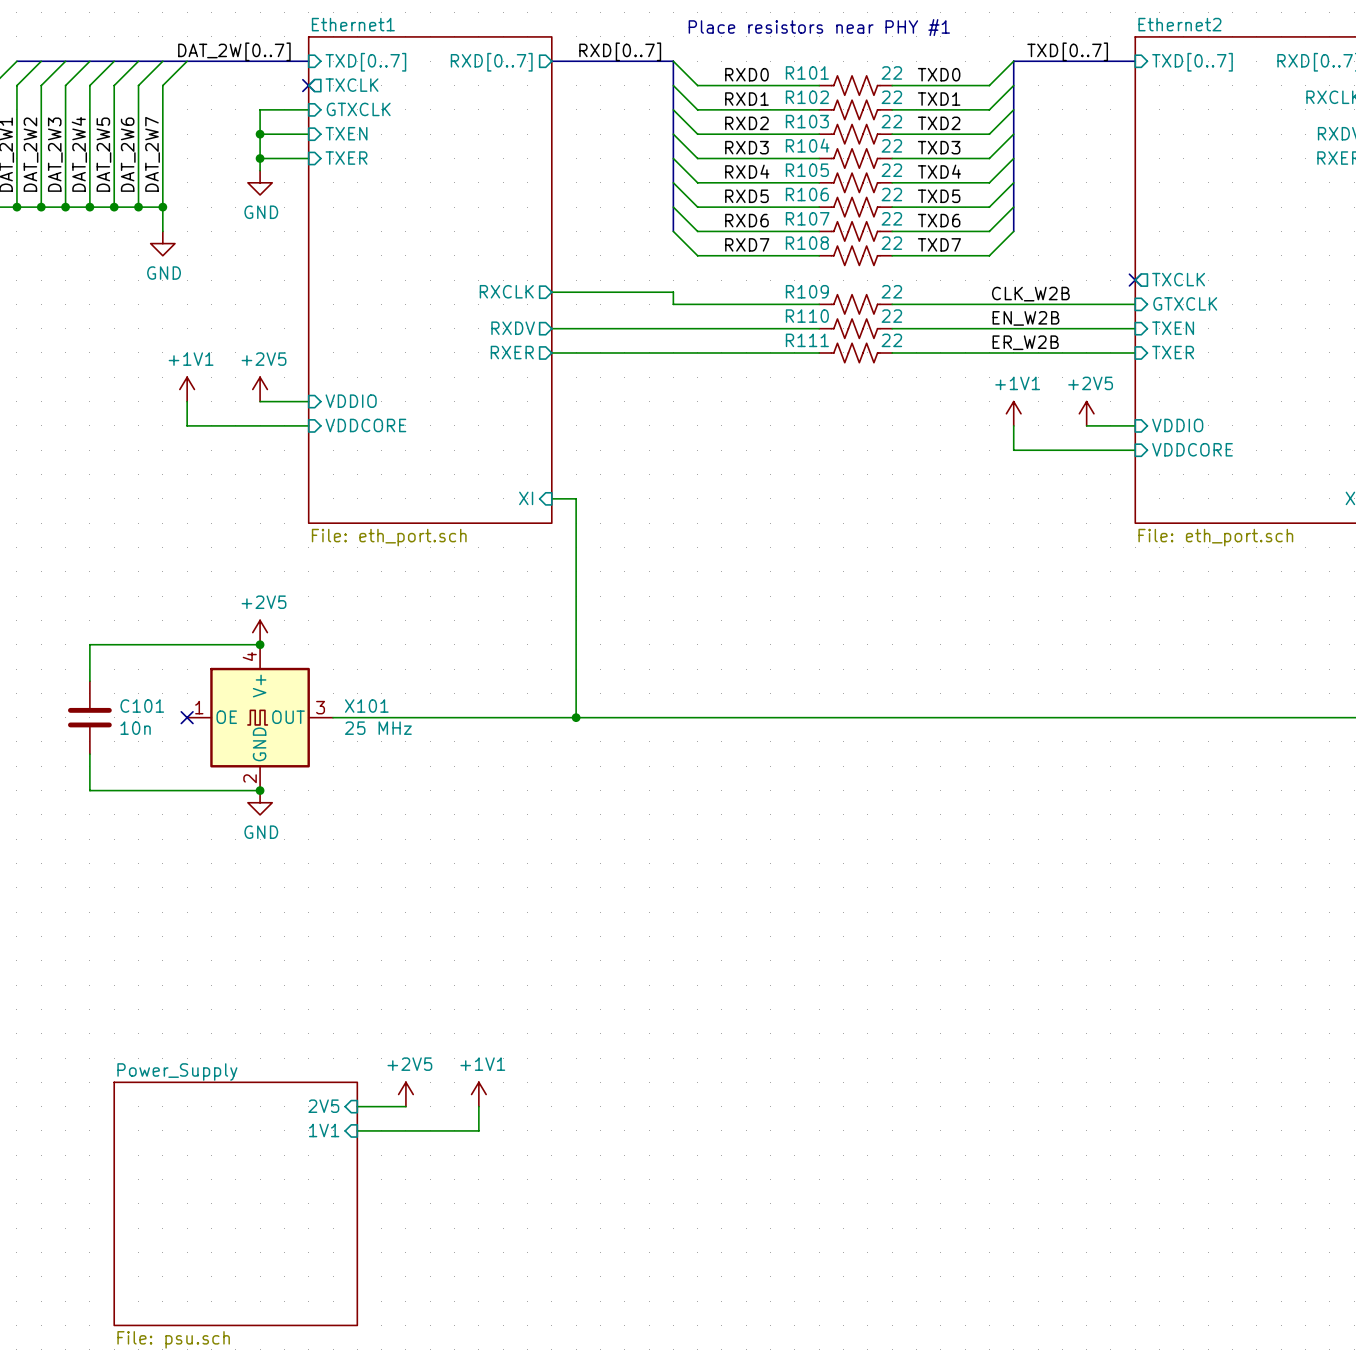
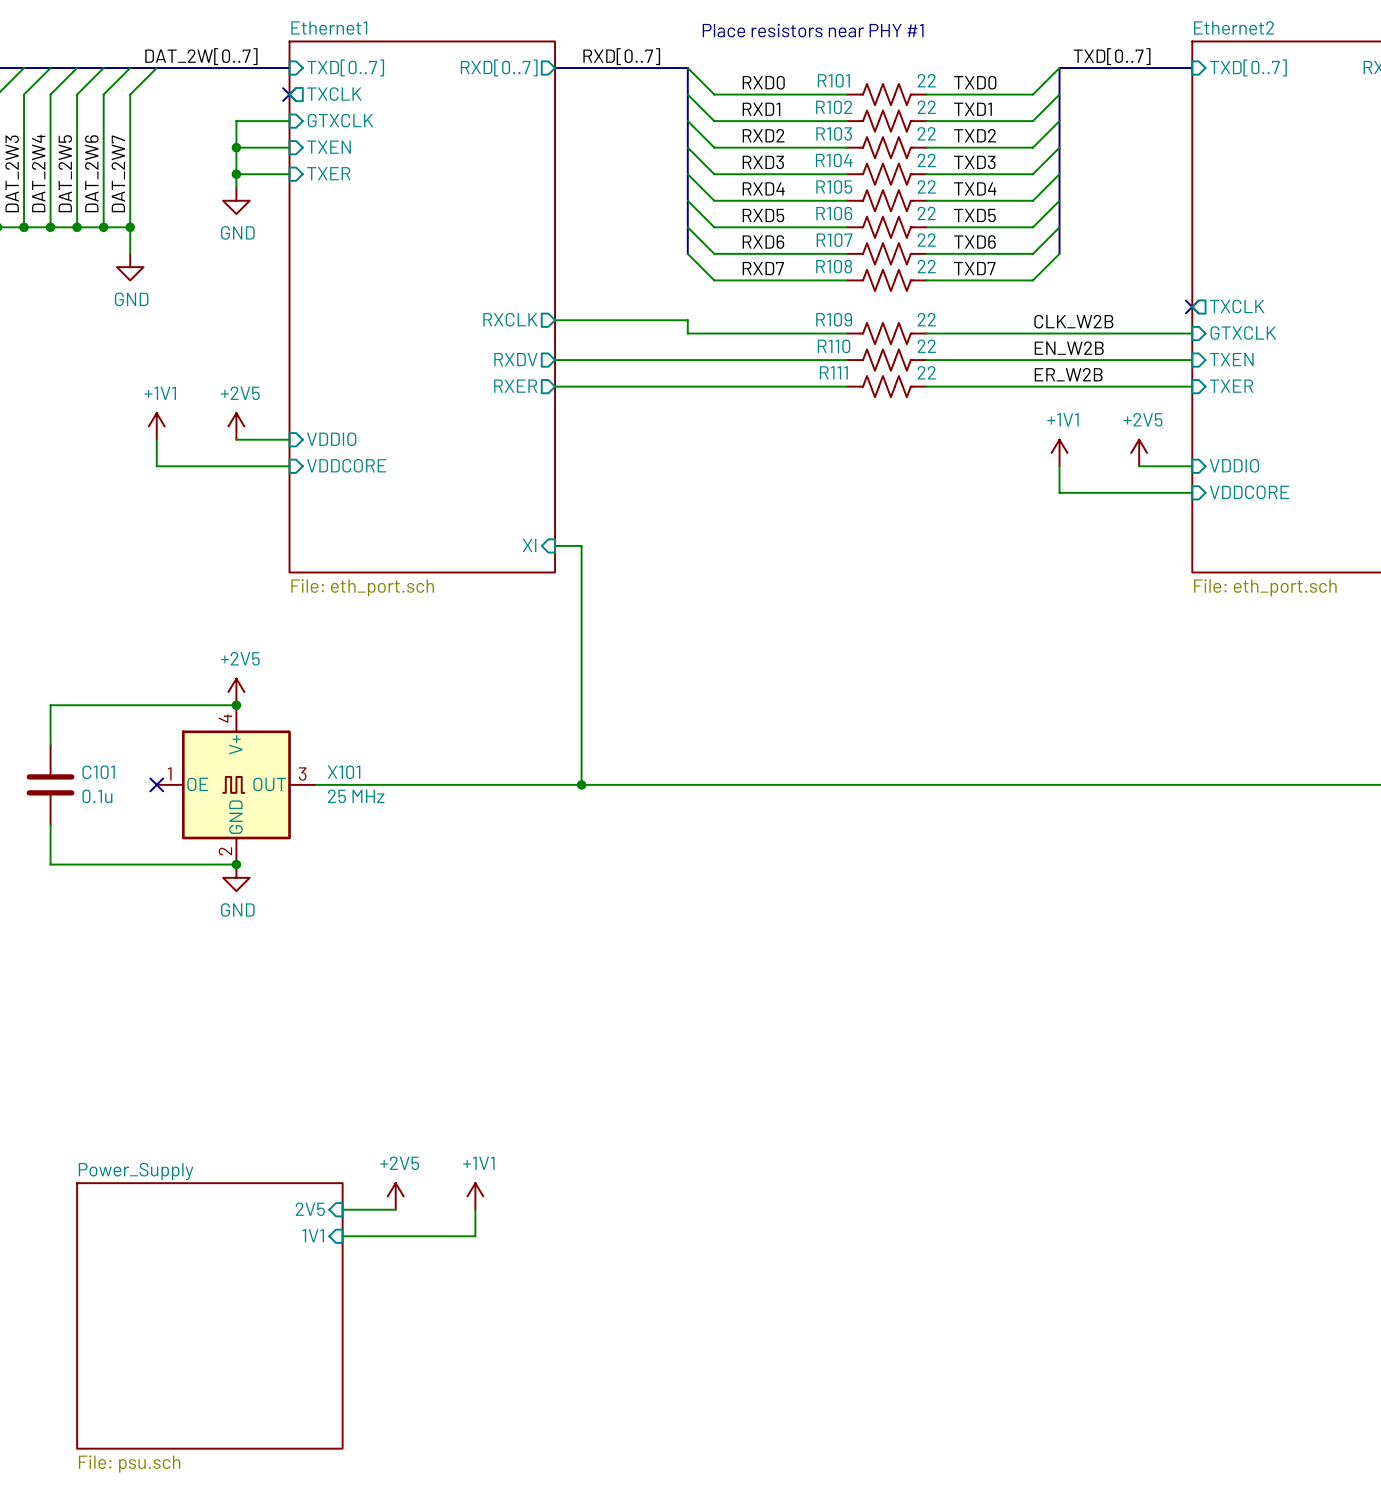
C101 value: 10n (135, 728) -> 0.1u (97, 796)

